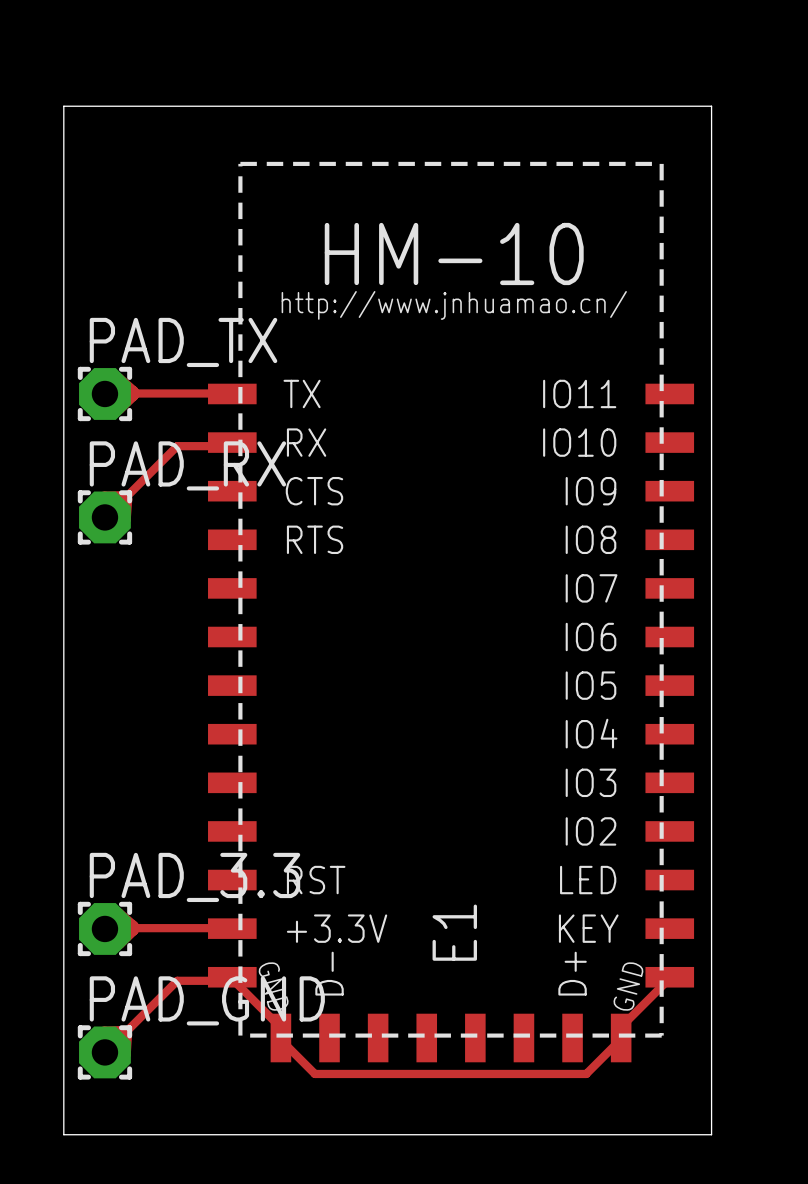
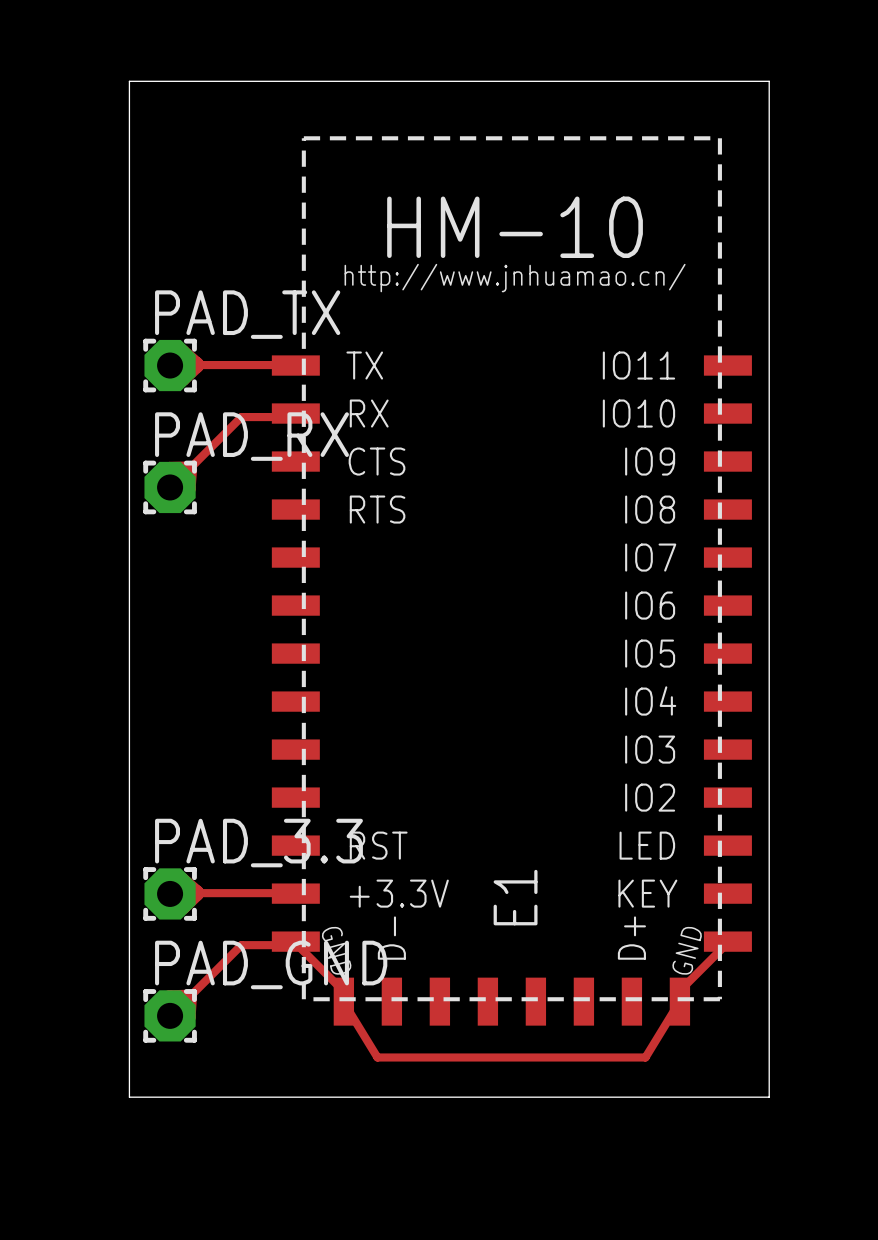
top track: (282, 1041) (314, 1073) (586, 1073) (618, 1041) -> (345, 1005) (377, 1057) (645, 1057) (677, 1005)

